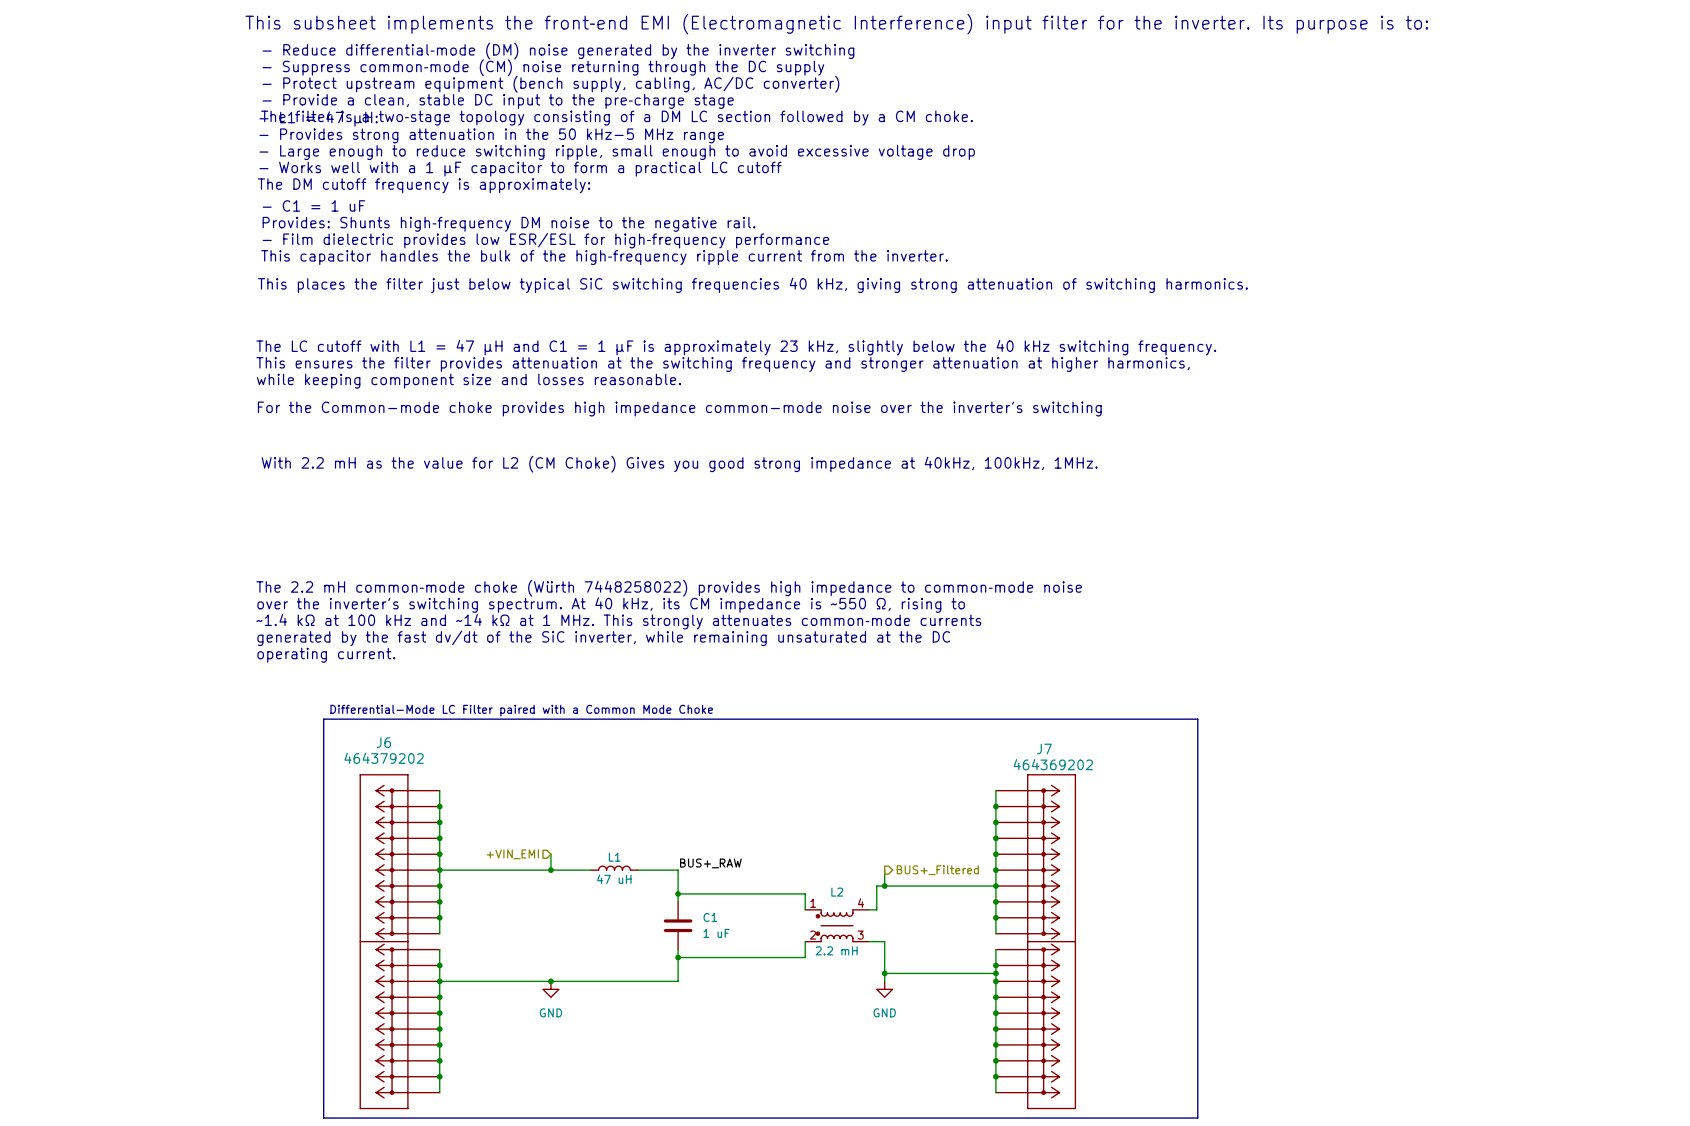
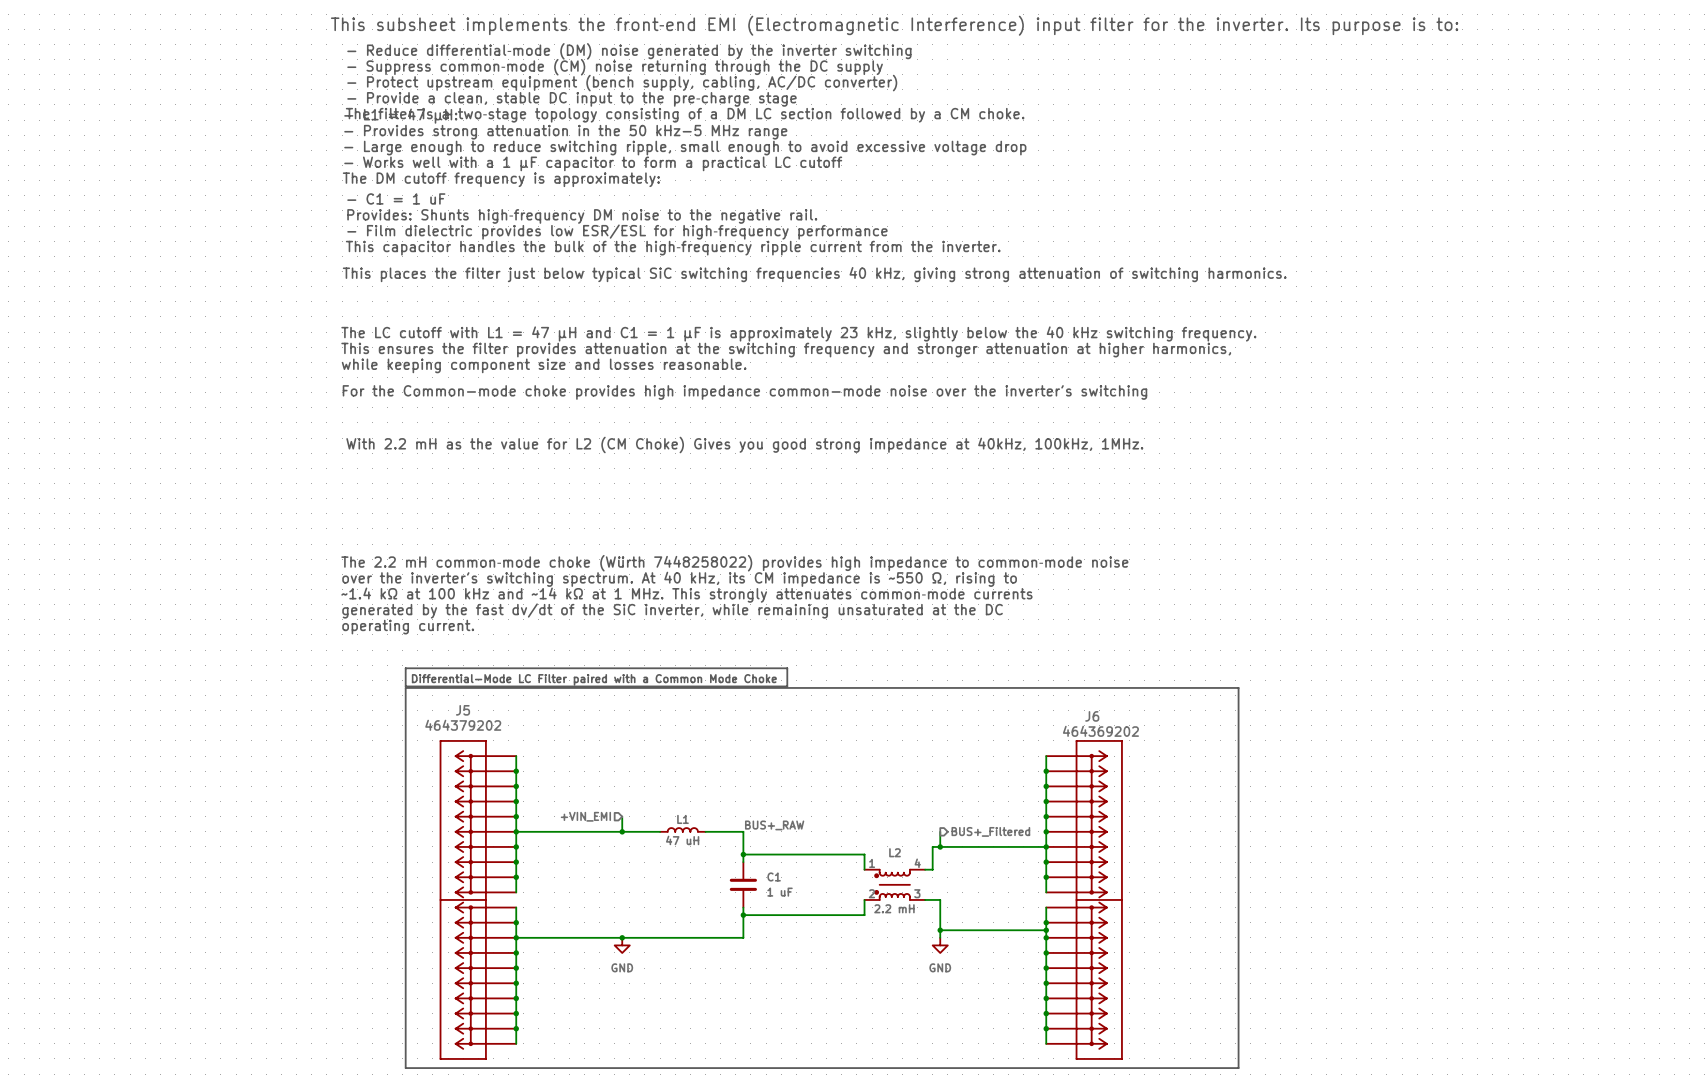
line: none -> (405, 668) (787, 668) (787, 686) (405, 686) (405, 668)
J6 name: J6 (383, 742) -> J5 (463, 710)
J7 name: J7 (1044, 748) -> J6 (1092, 716)

